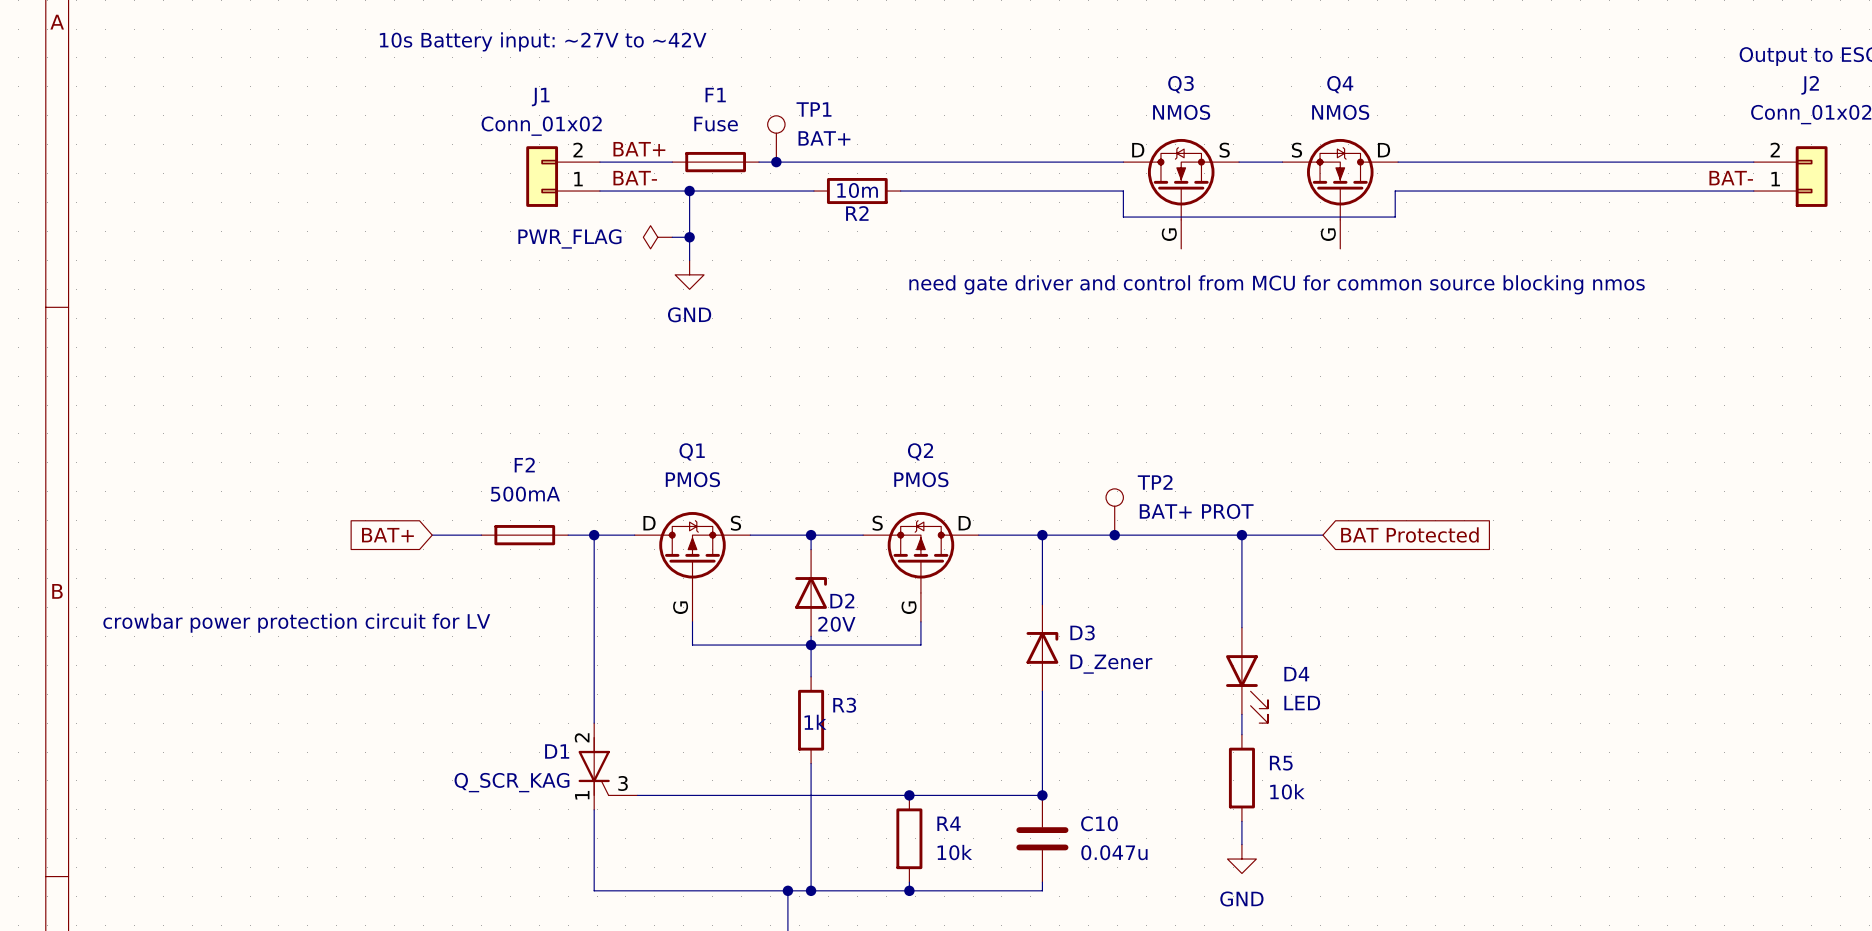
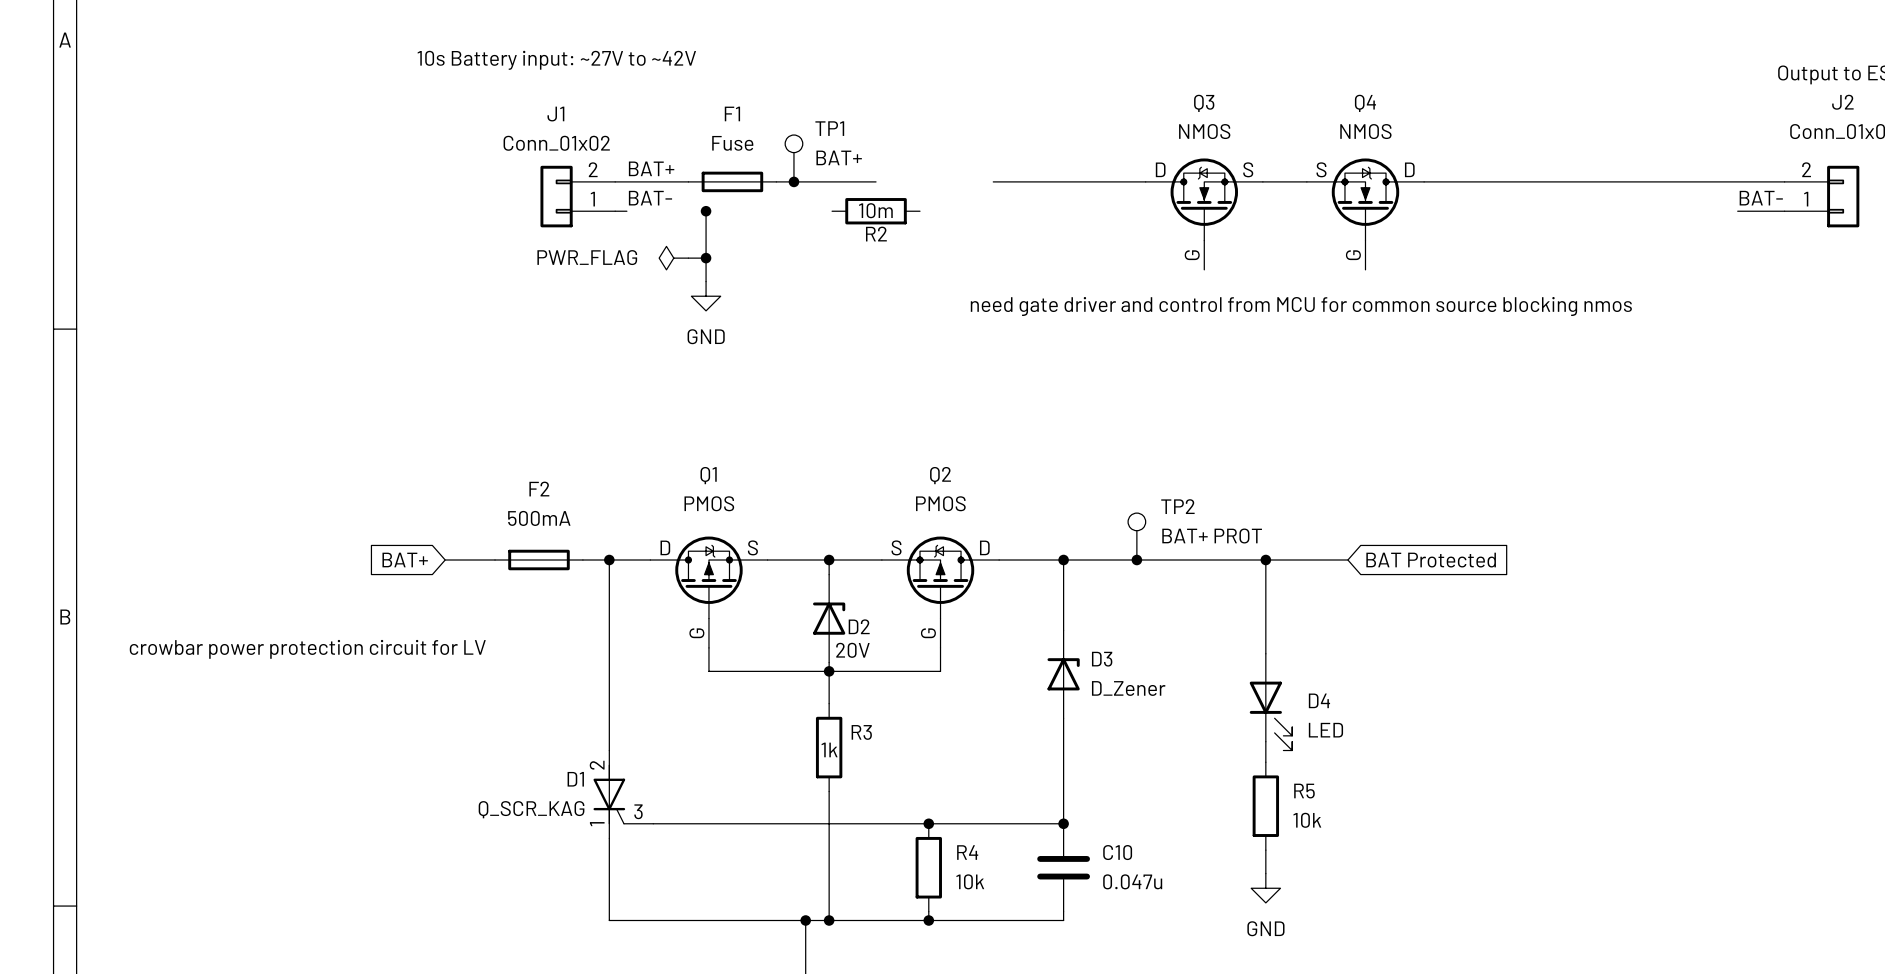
wire: (857, 162) (973, 162) -> none
wire: (611, 191) (813, 191) -> none
wire: (900, 191) (1123, 191) (1123, 217) (1395, 217) (1395, 191) (1707, 191) -> none

